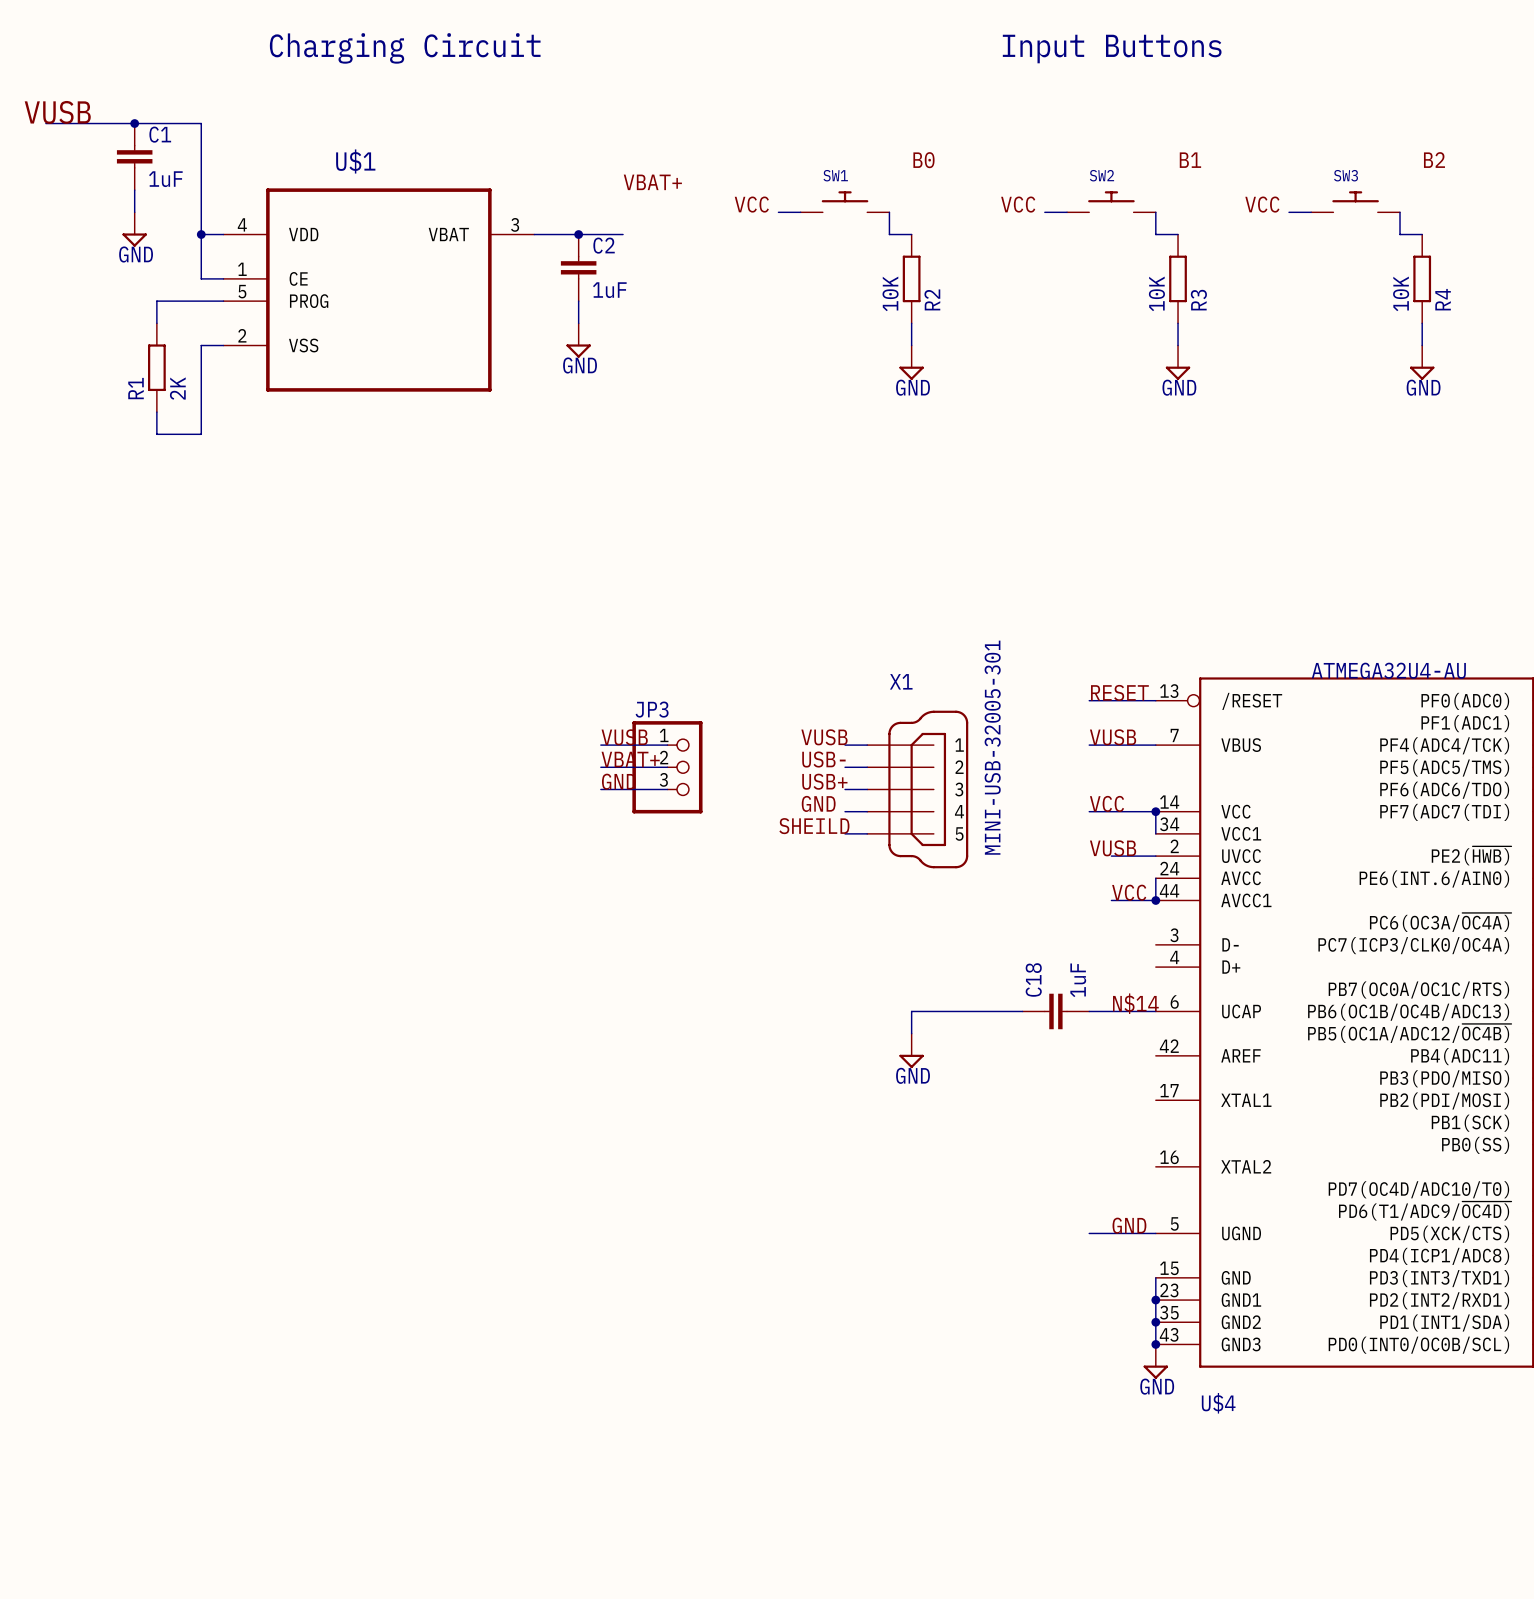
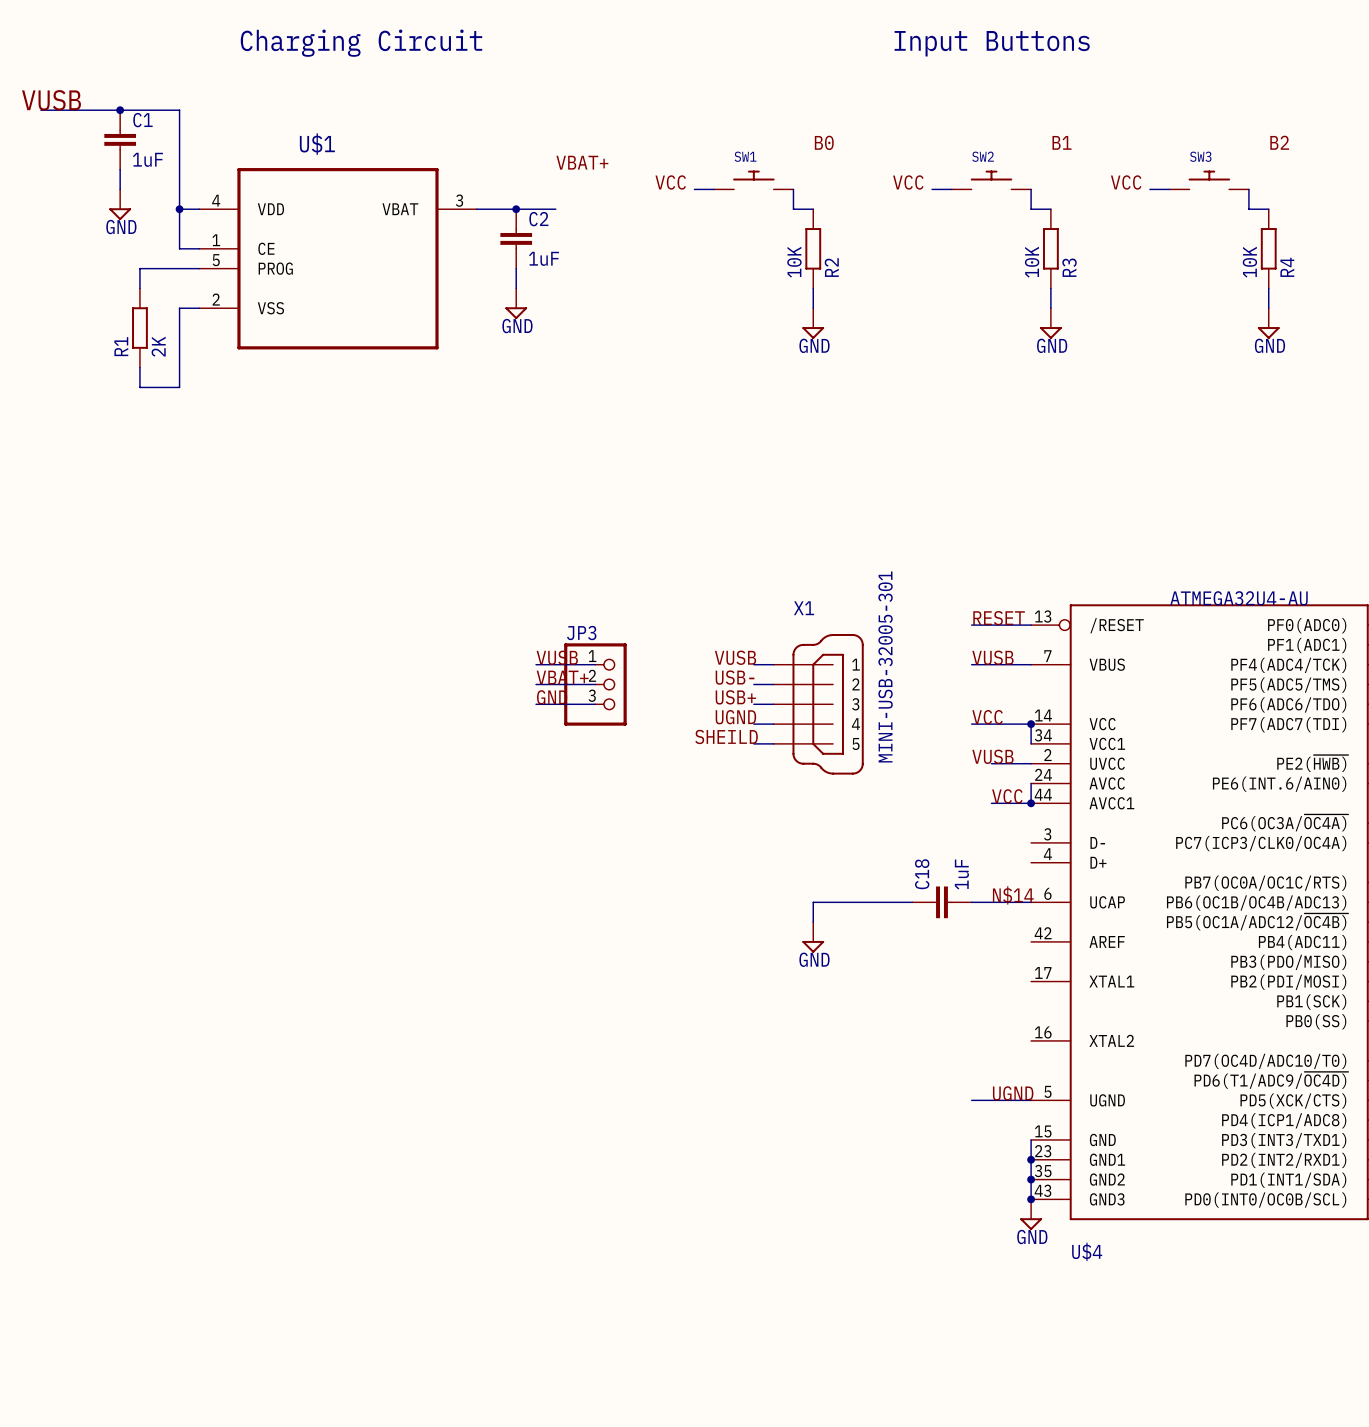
label: GND (818, 803) -> UGND (735, 717)
label: GND (1129, 1225) -> UGND (1013, 1093)

